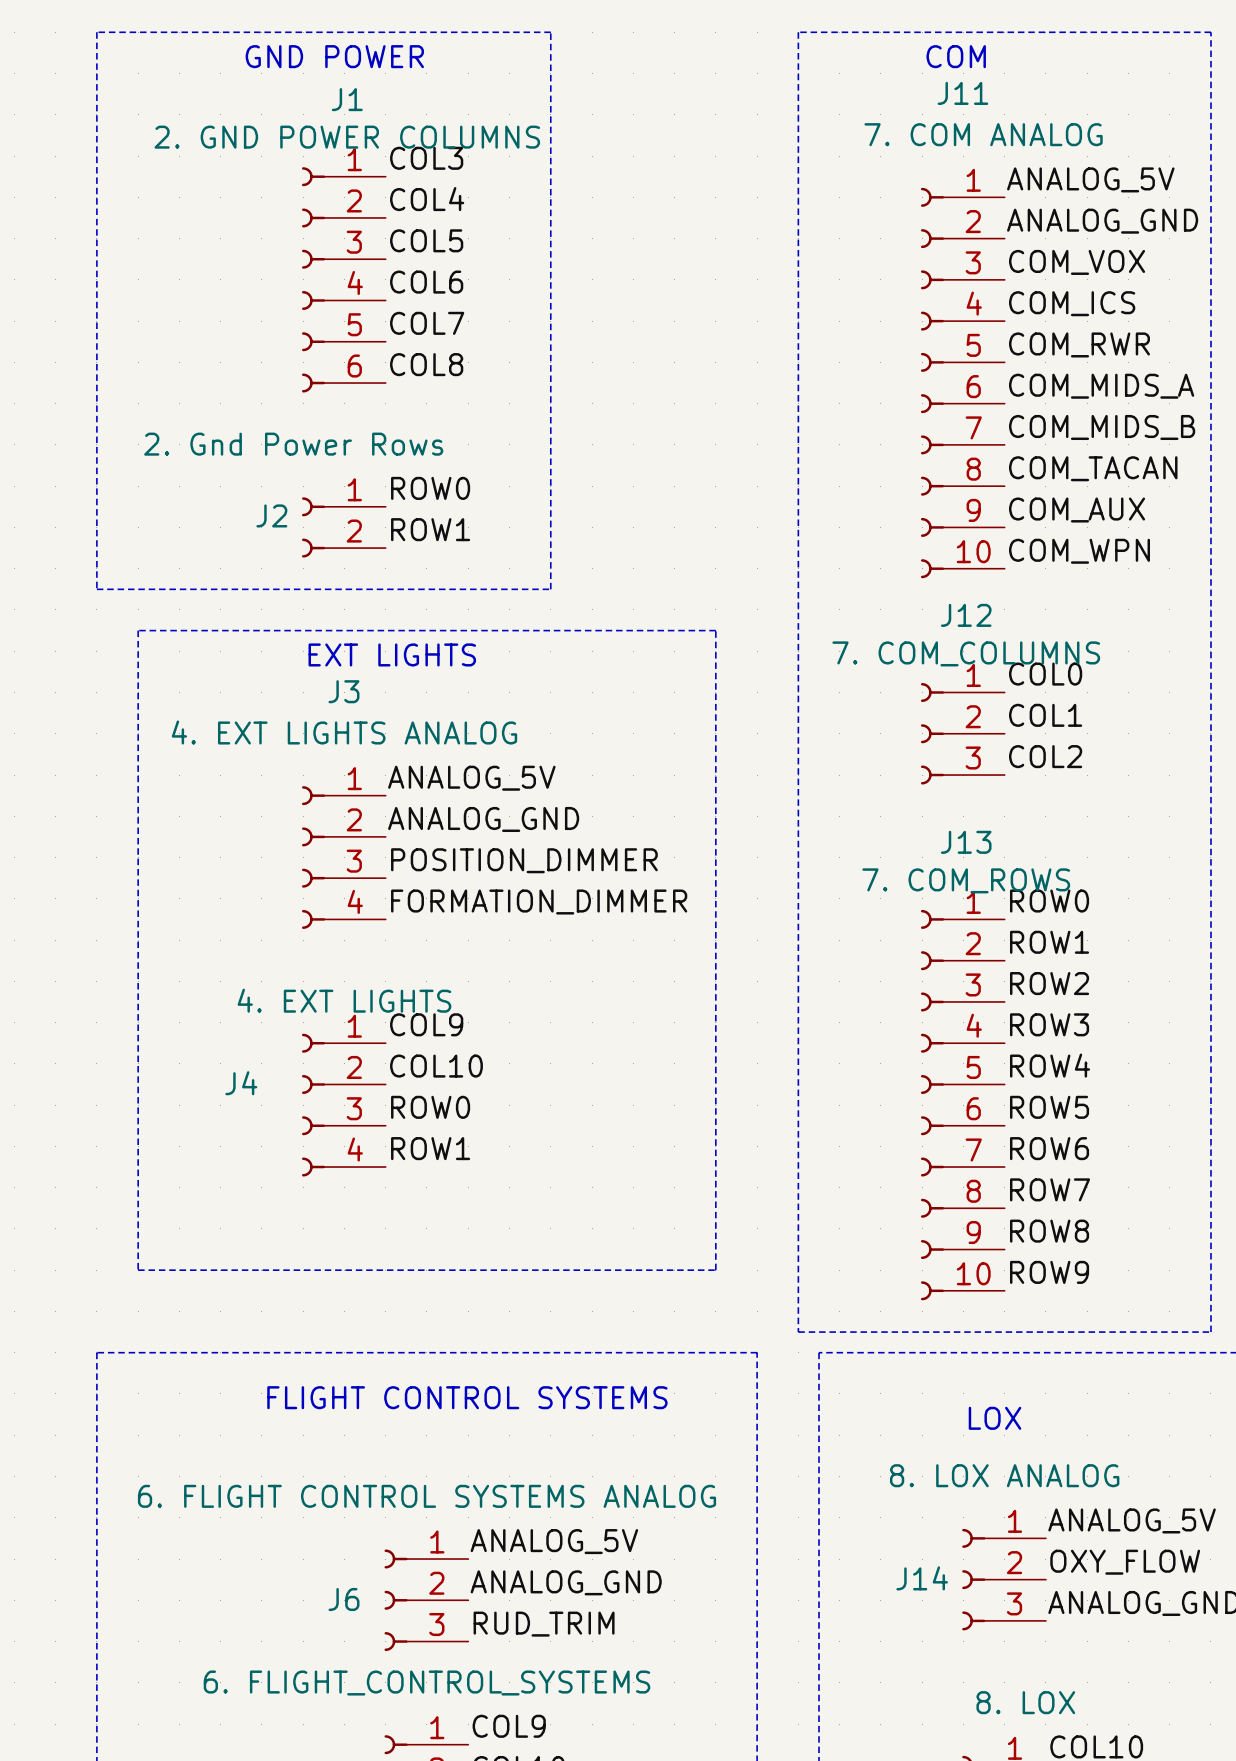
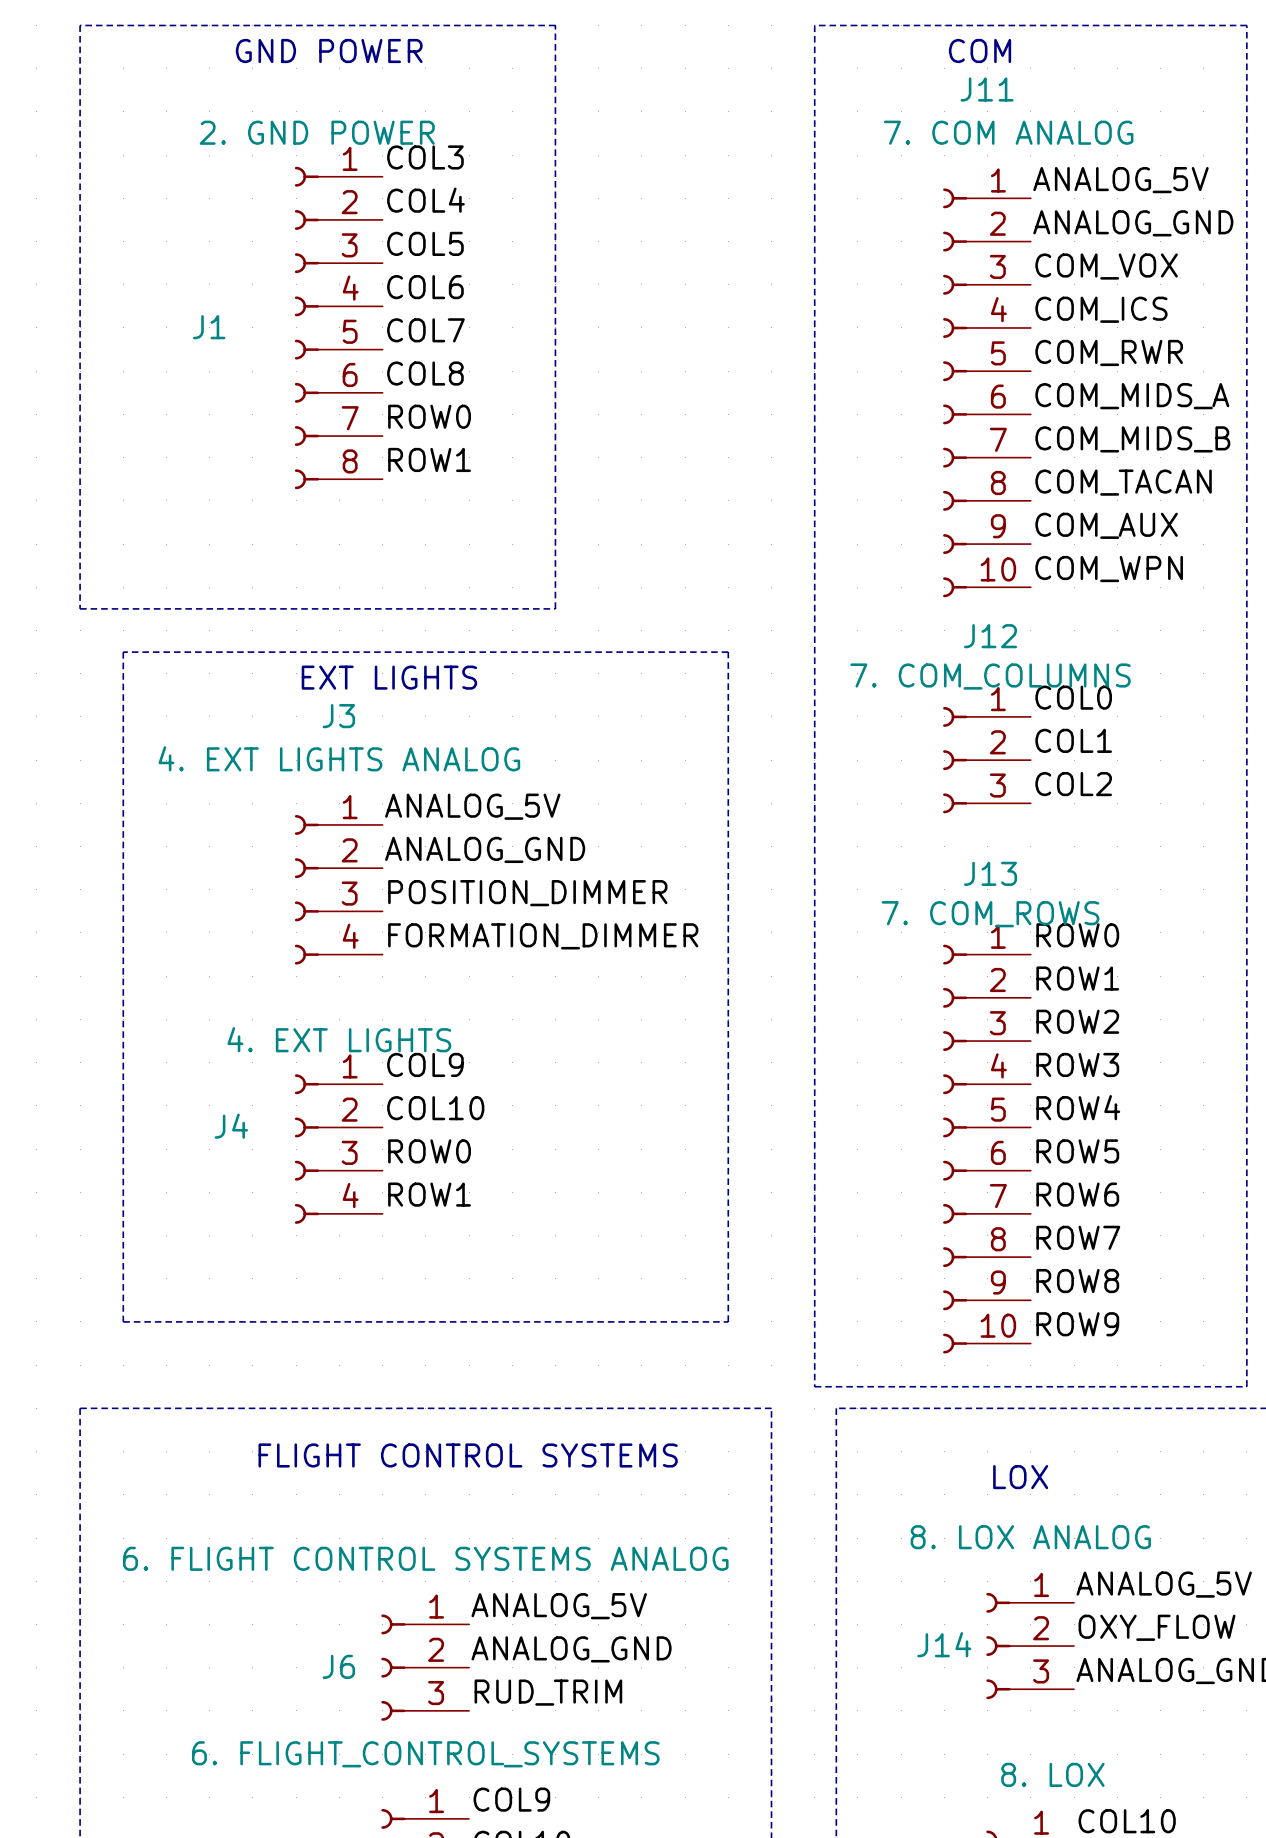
J1 name position: J1 (347, 99) -> J1 (209, 327)
J1 value: 2. GND POWER COLUMNS (347, 137) -> 2. GND POWER (317, 132)
J1 symbol: [301, 167, 386, 393] -> [294, 166, 383, 490]
label position: ROW0 (430, 488) -> ROW0 (429, 416)
J2: 2. Gnd Power Rows (343, 527) -> none
label position: ROW1 (430, 529) -> ROW1 (429, 459)

